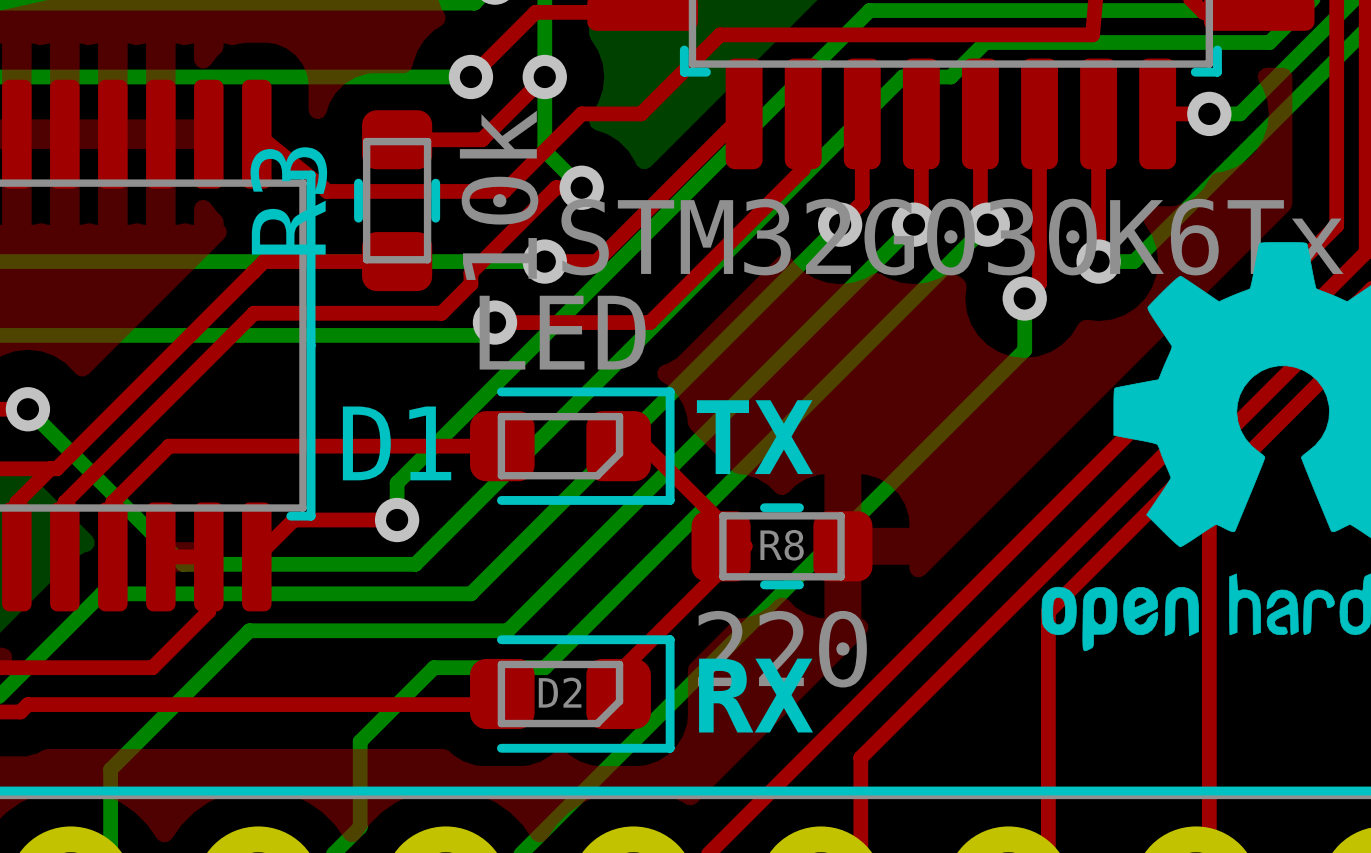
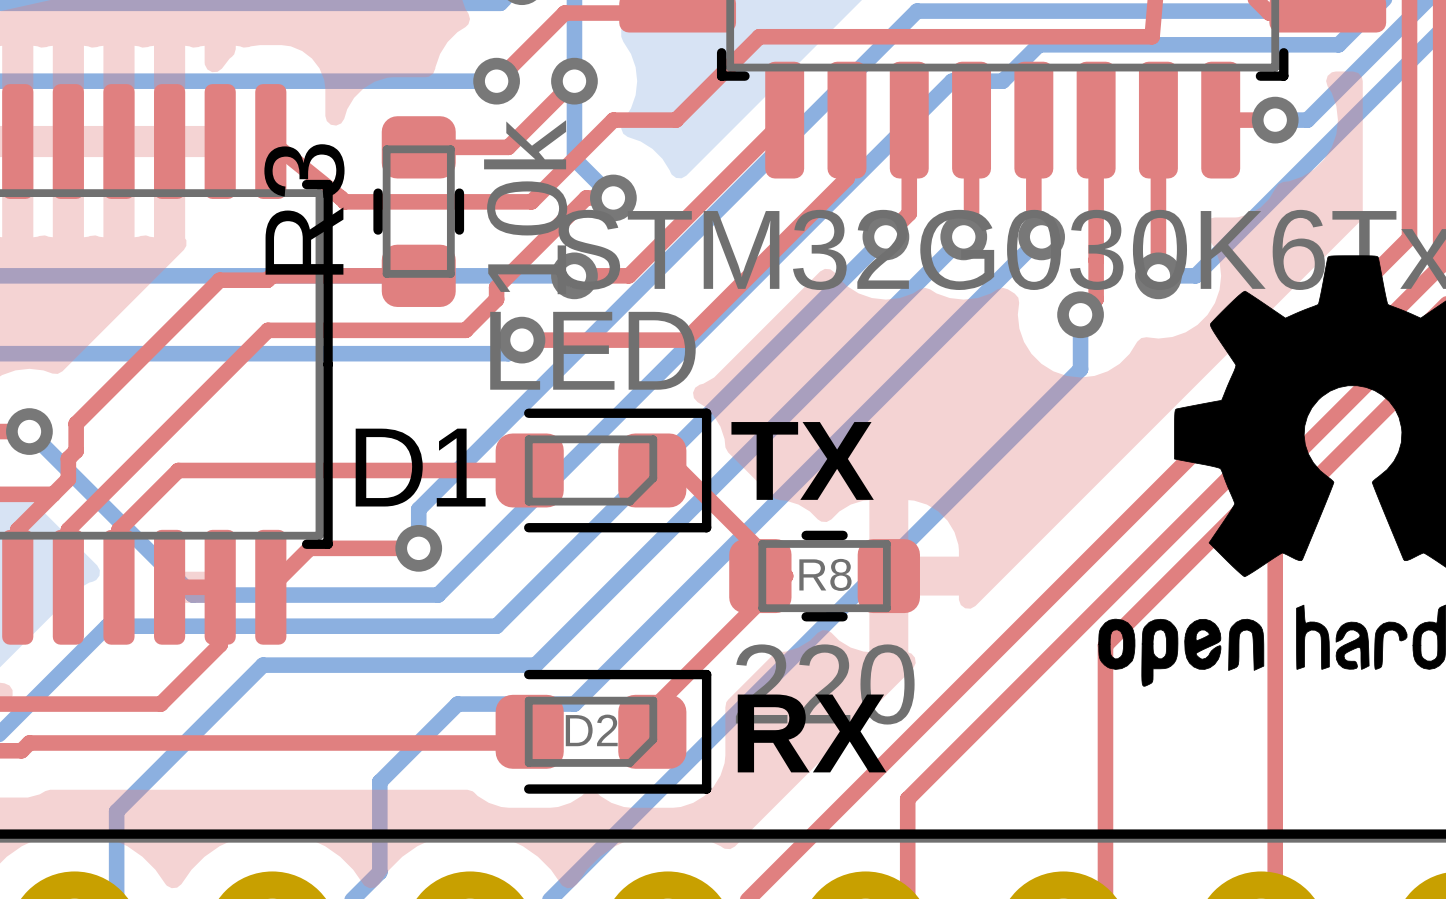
top track: (263, 261) (56, 468) (50, 468) -> (278, 275) (271, 275) (267, 280) (219, 280) (76, 423) (76, 450) (68, 458) (68, 479) (53, 494)

